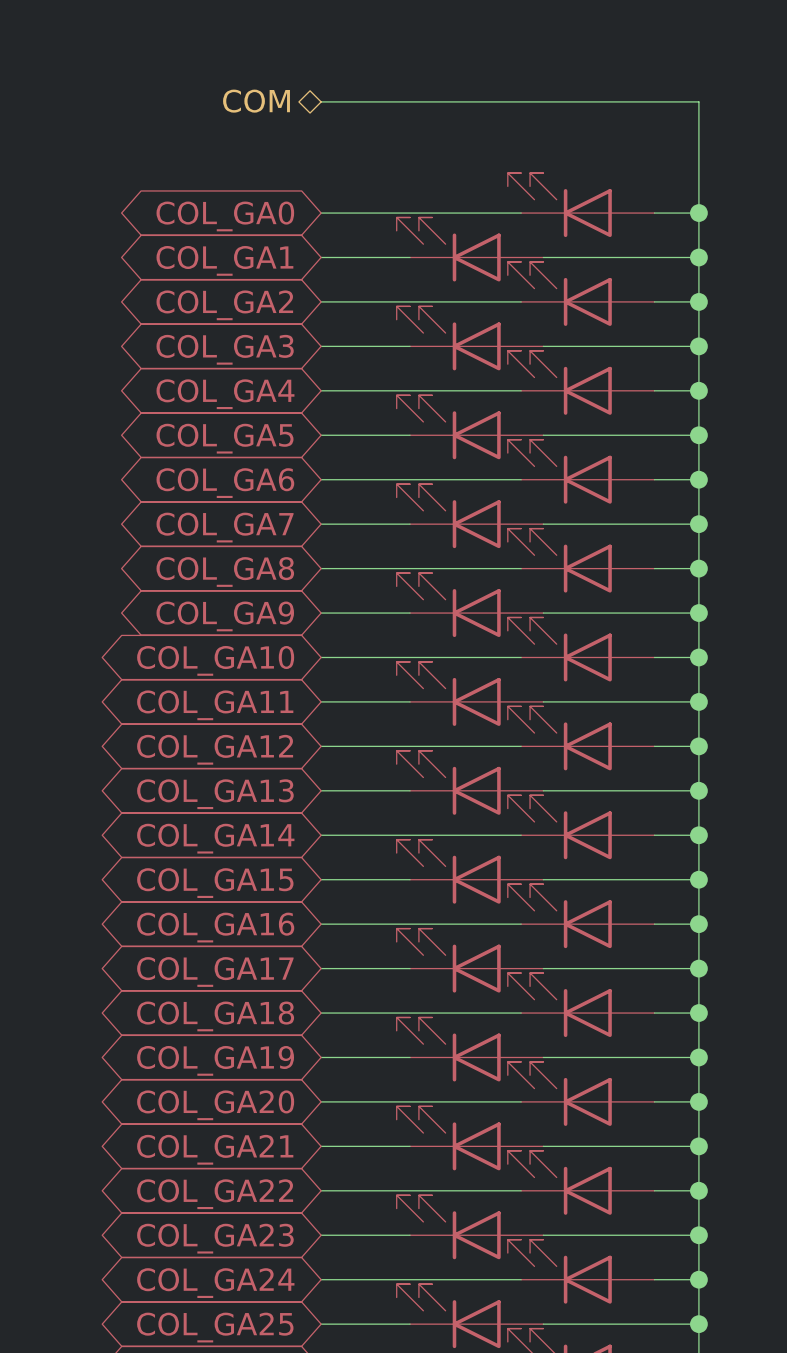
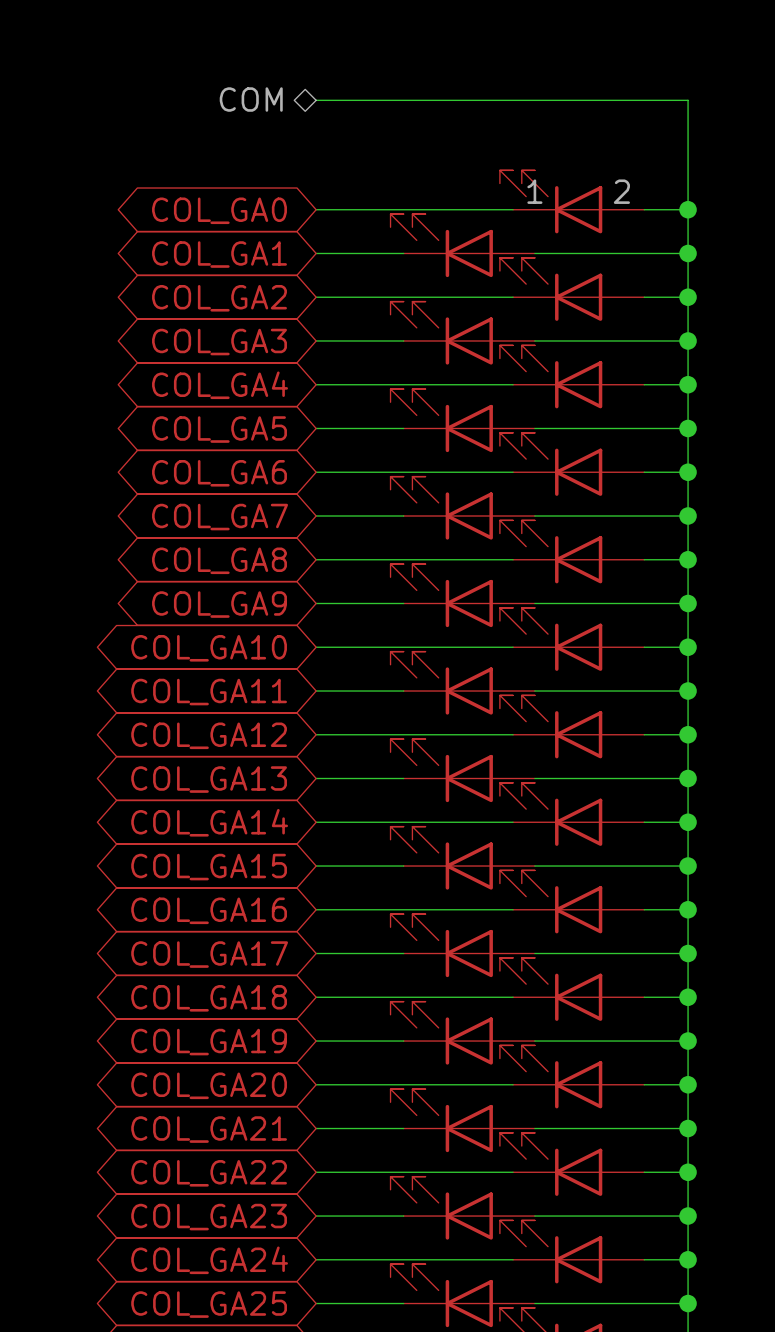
part pin number: none -> 1 (534, 191)
part pin number: none -> 2 (621, 191)

